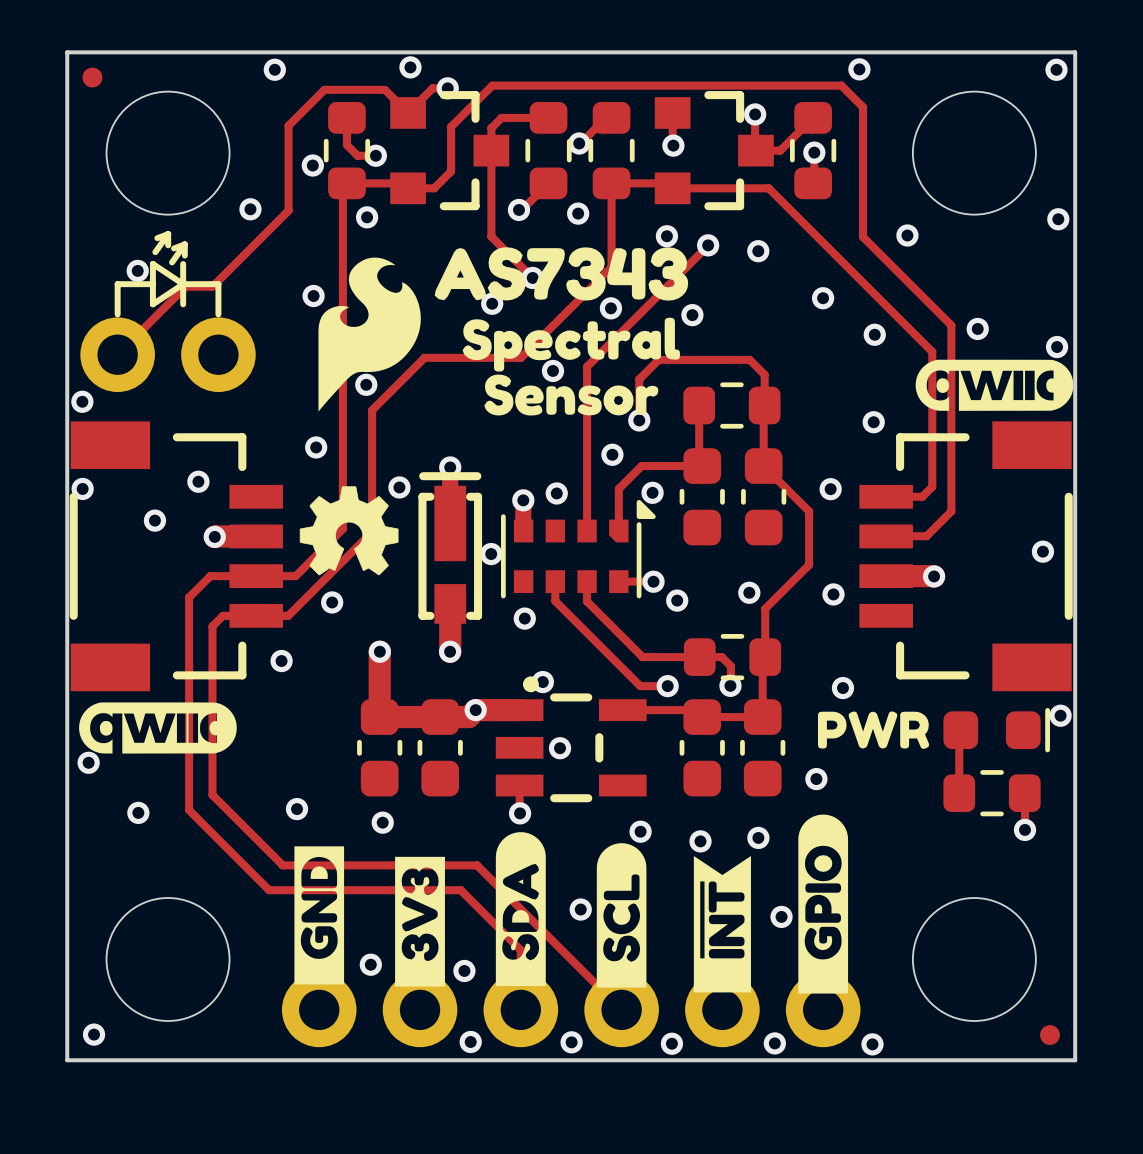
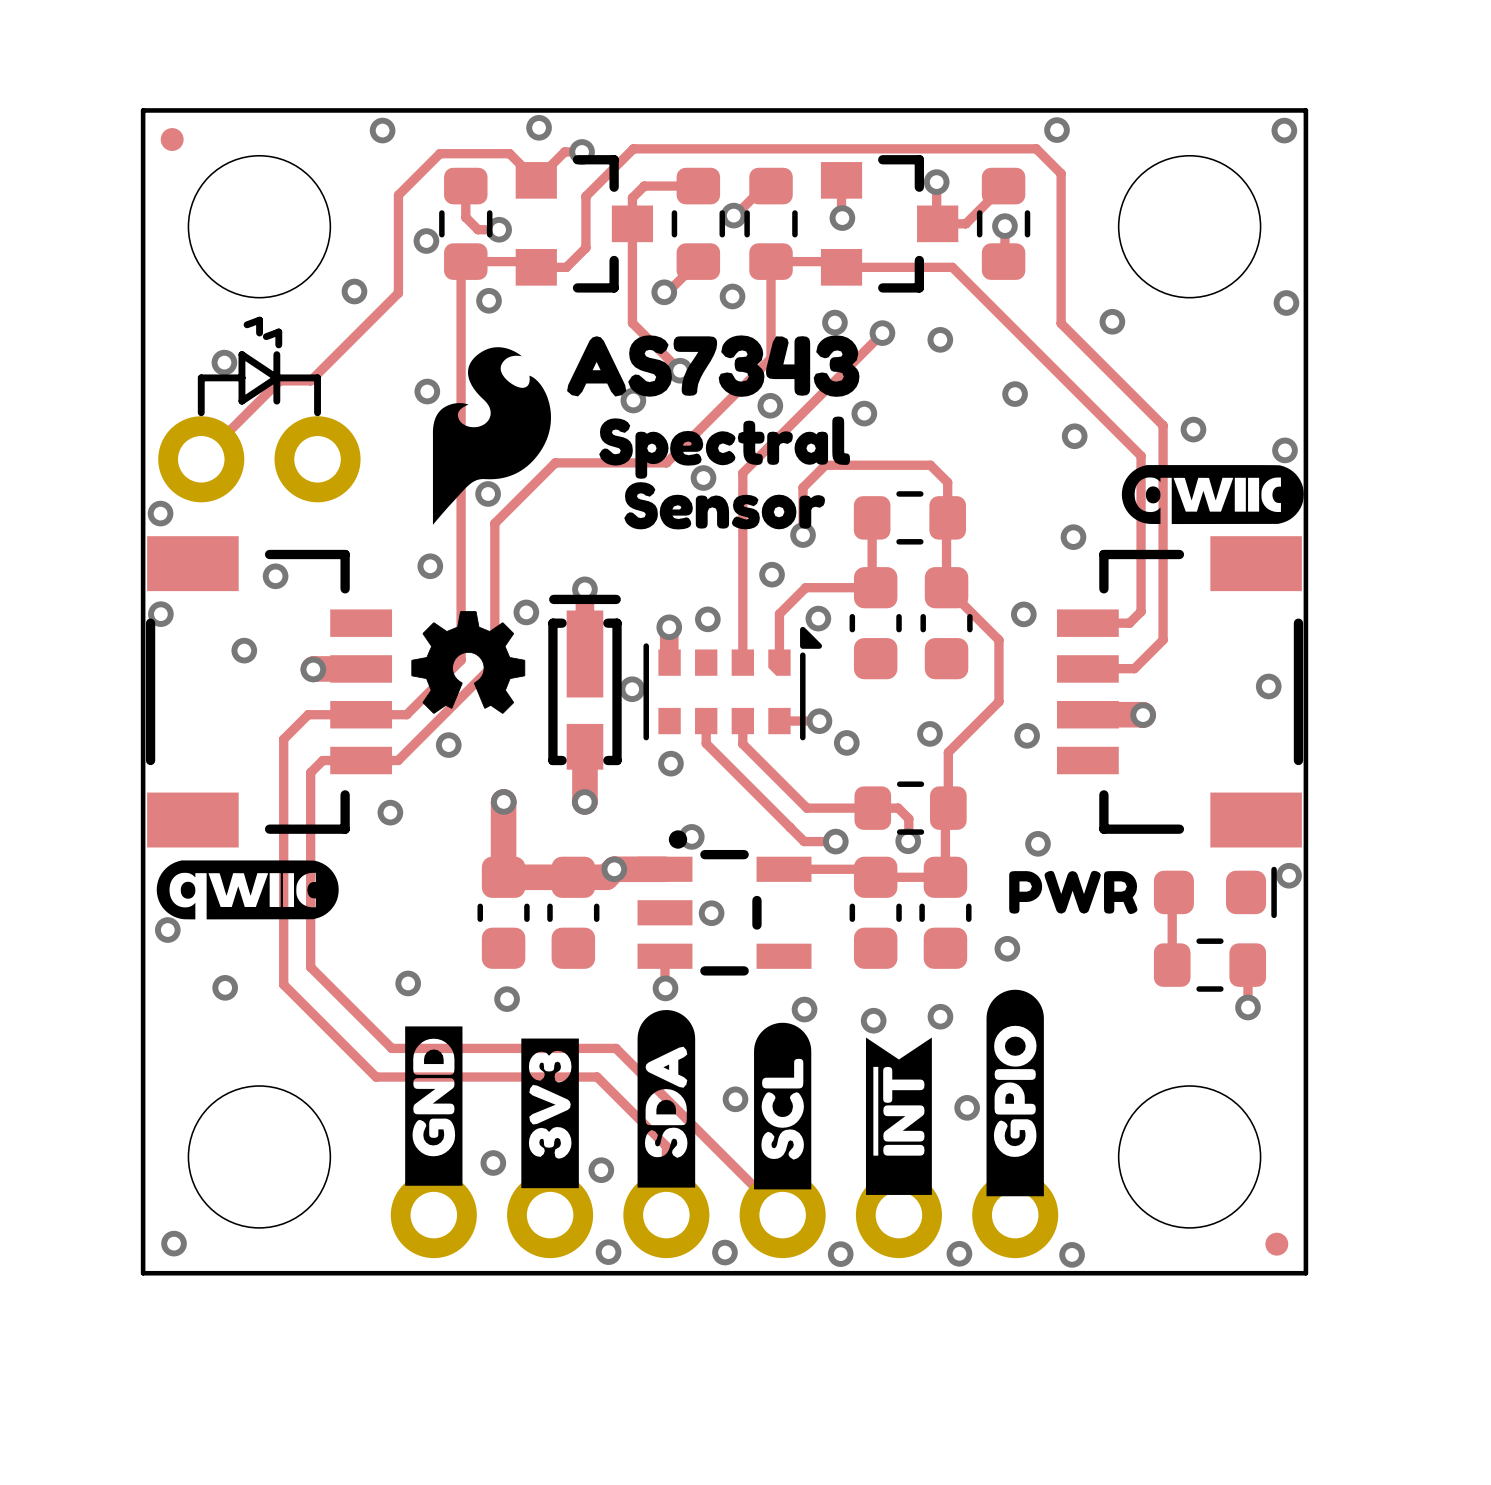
line: (168, 234) (155, 252) -> none
line: (184, 244) (172, 262) -> none
via position: (198, 481) -> (275, 576)

